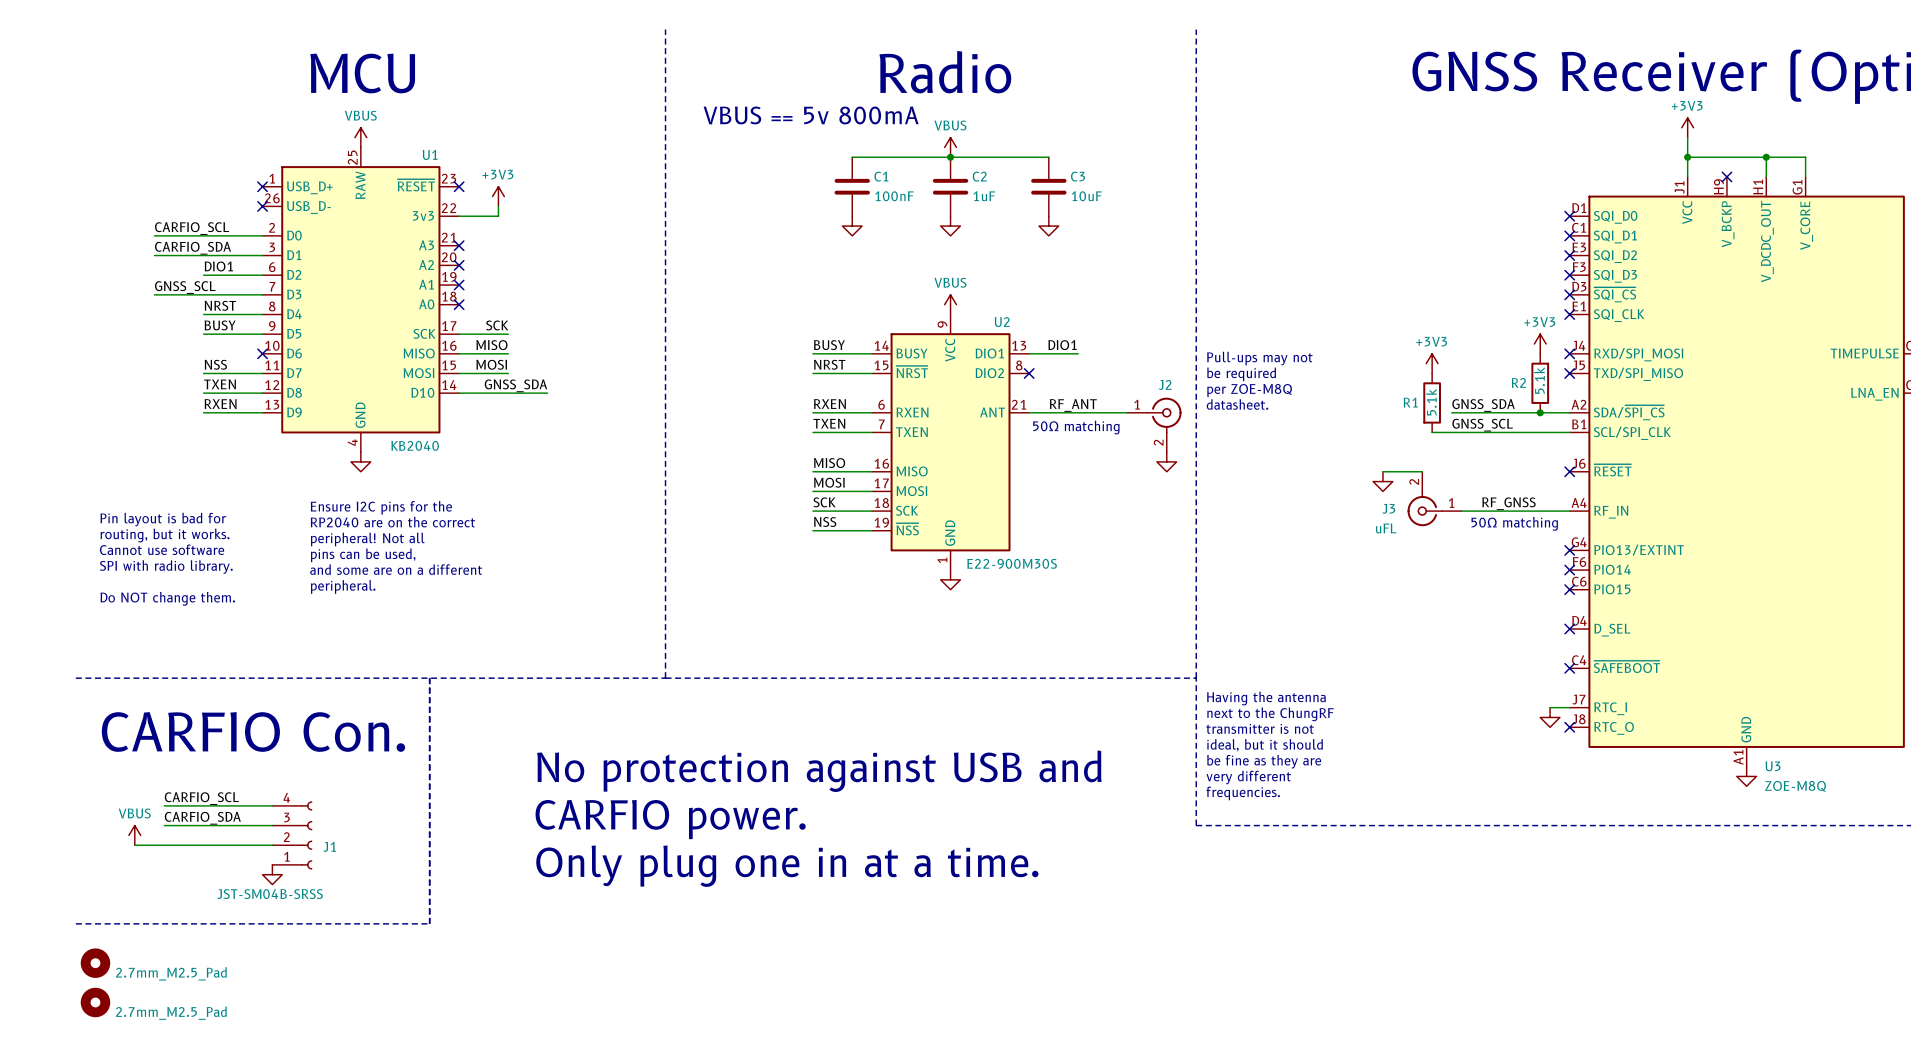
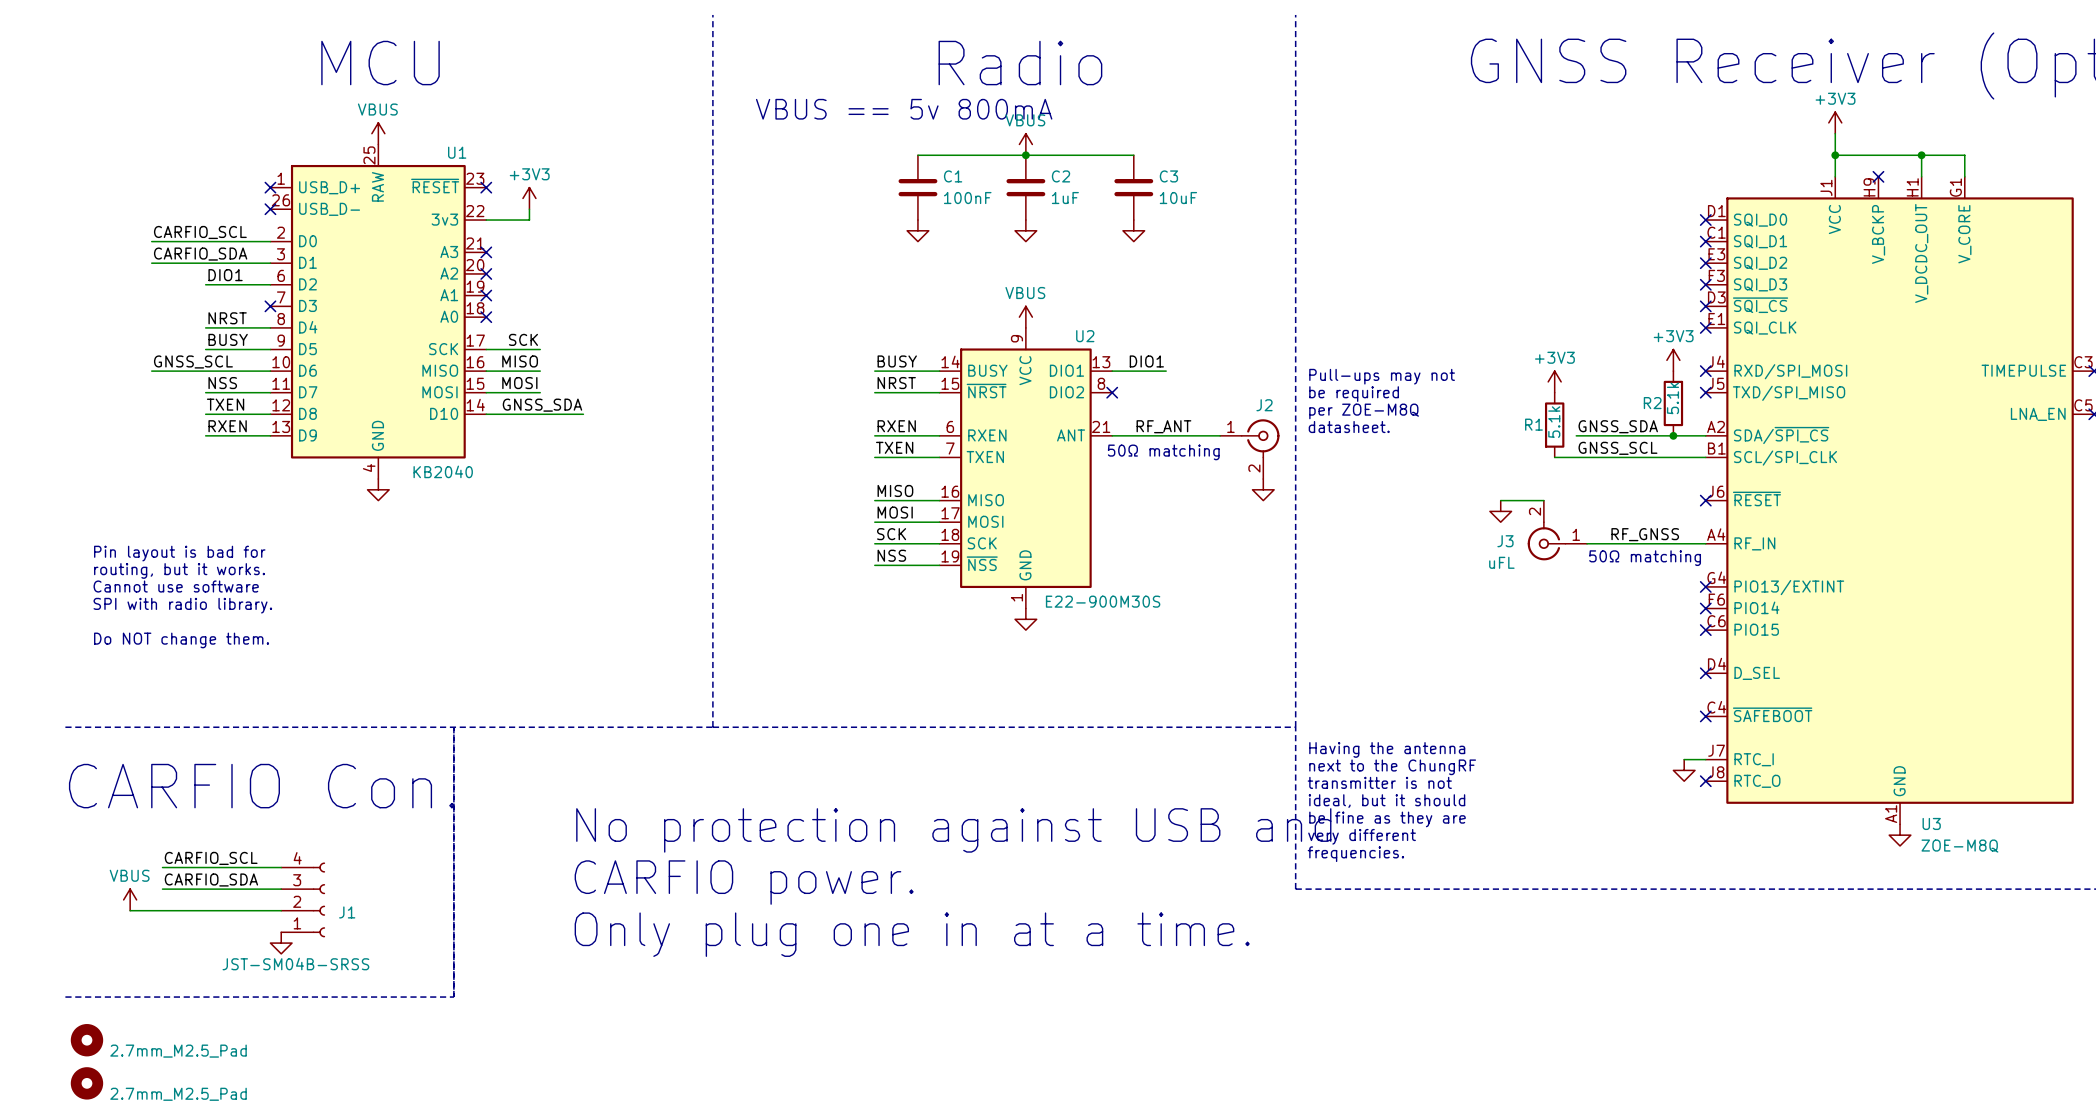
label position: GNSS_SCL (185, 287) -> GNSS_SCL (193, 361)
wire: (154, 294) (262, 294) -> (151, 371) (270, 371)
no-connect mark: none -> (270, 306)
no-connect mark: (262, 353) -> none
text: Ensure I2C pins for the (381, 507) -> none
text: RP2040 are on the correct (392, 522) -> none
text: peripheral! Not all (367, 539) -> none
text: pins can be used, (363, 555) -> none
text: and some are on a different (396, 569) -> none
text: peripheral. (343, 586) -> none

